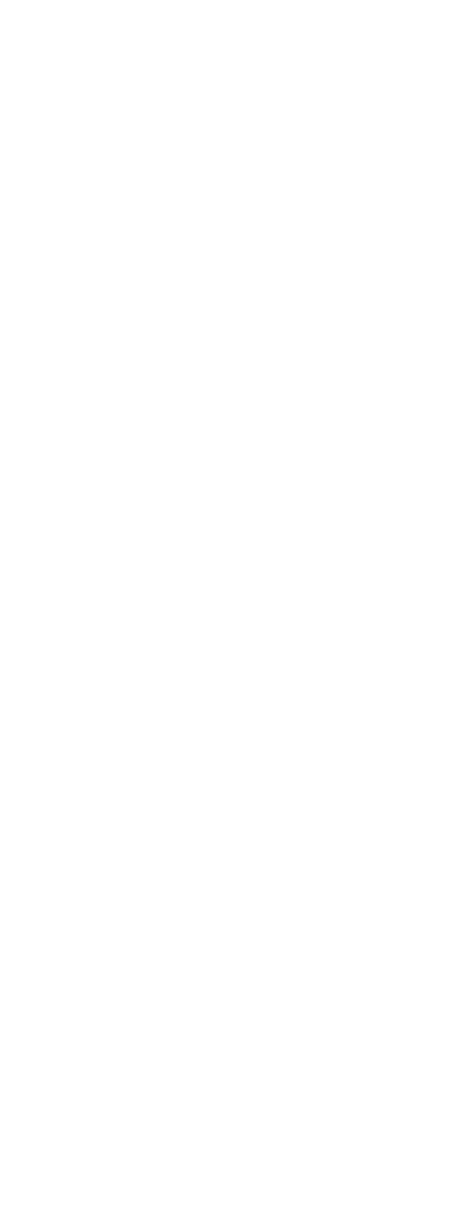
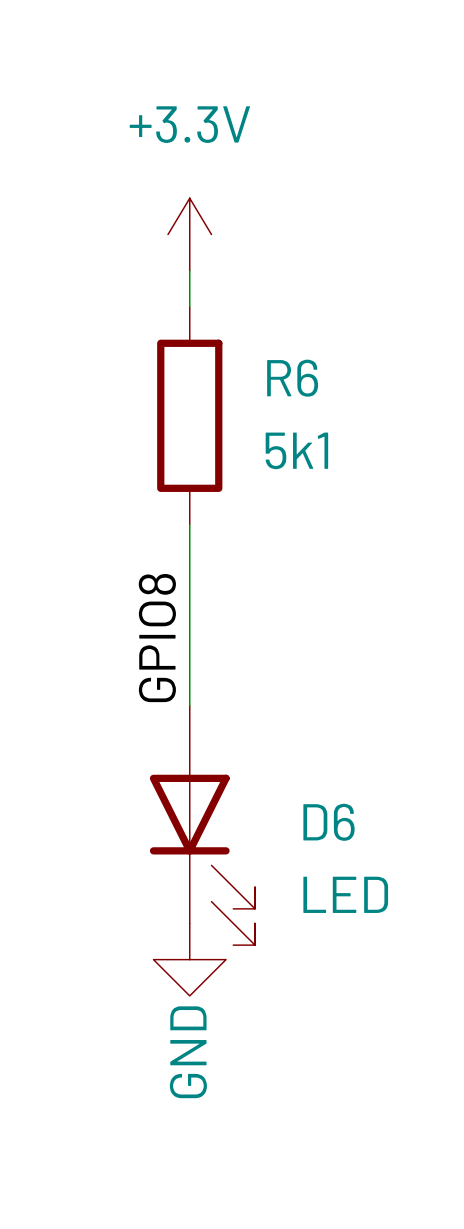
power symbol: none -> +3.3V (189, 234)
wire: none -> (189, 270) (189, 307)
R6: none -> 5k1 (189, 415)
wire: none -> (189, 524) (189, 705)
label: none -> GPIO8 (157, 638)
D6: none -> LED (202, 825)
power symbol: none -> GND (189, 959)

